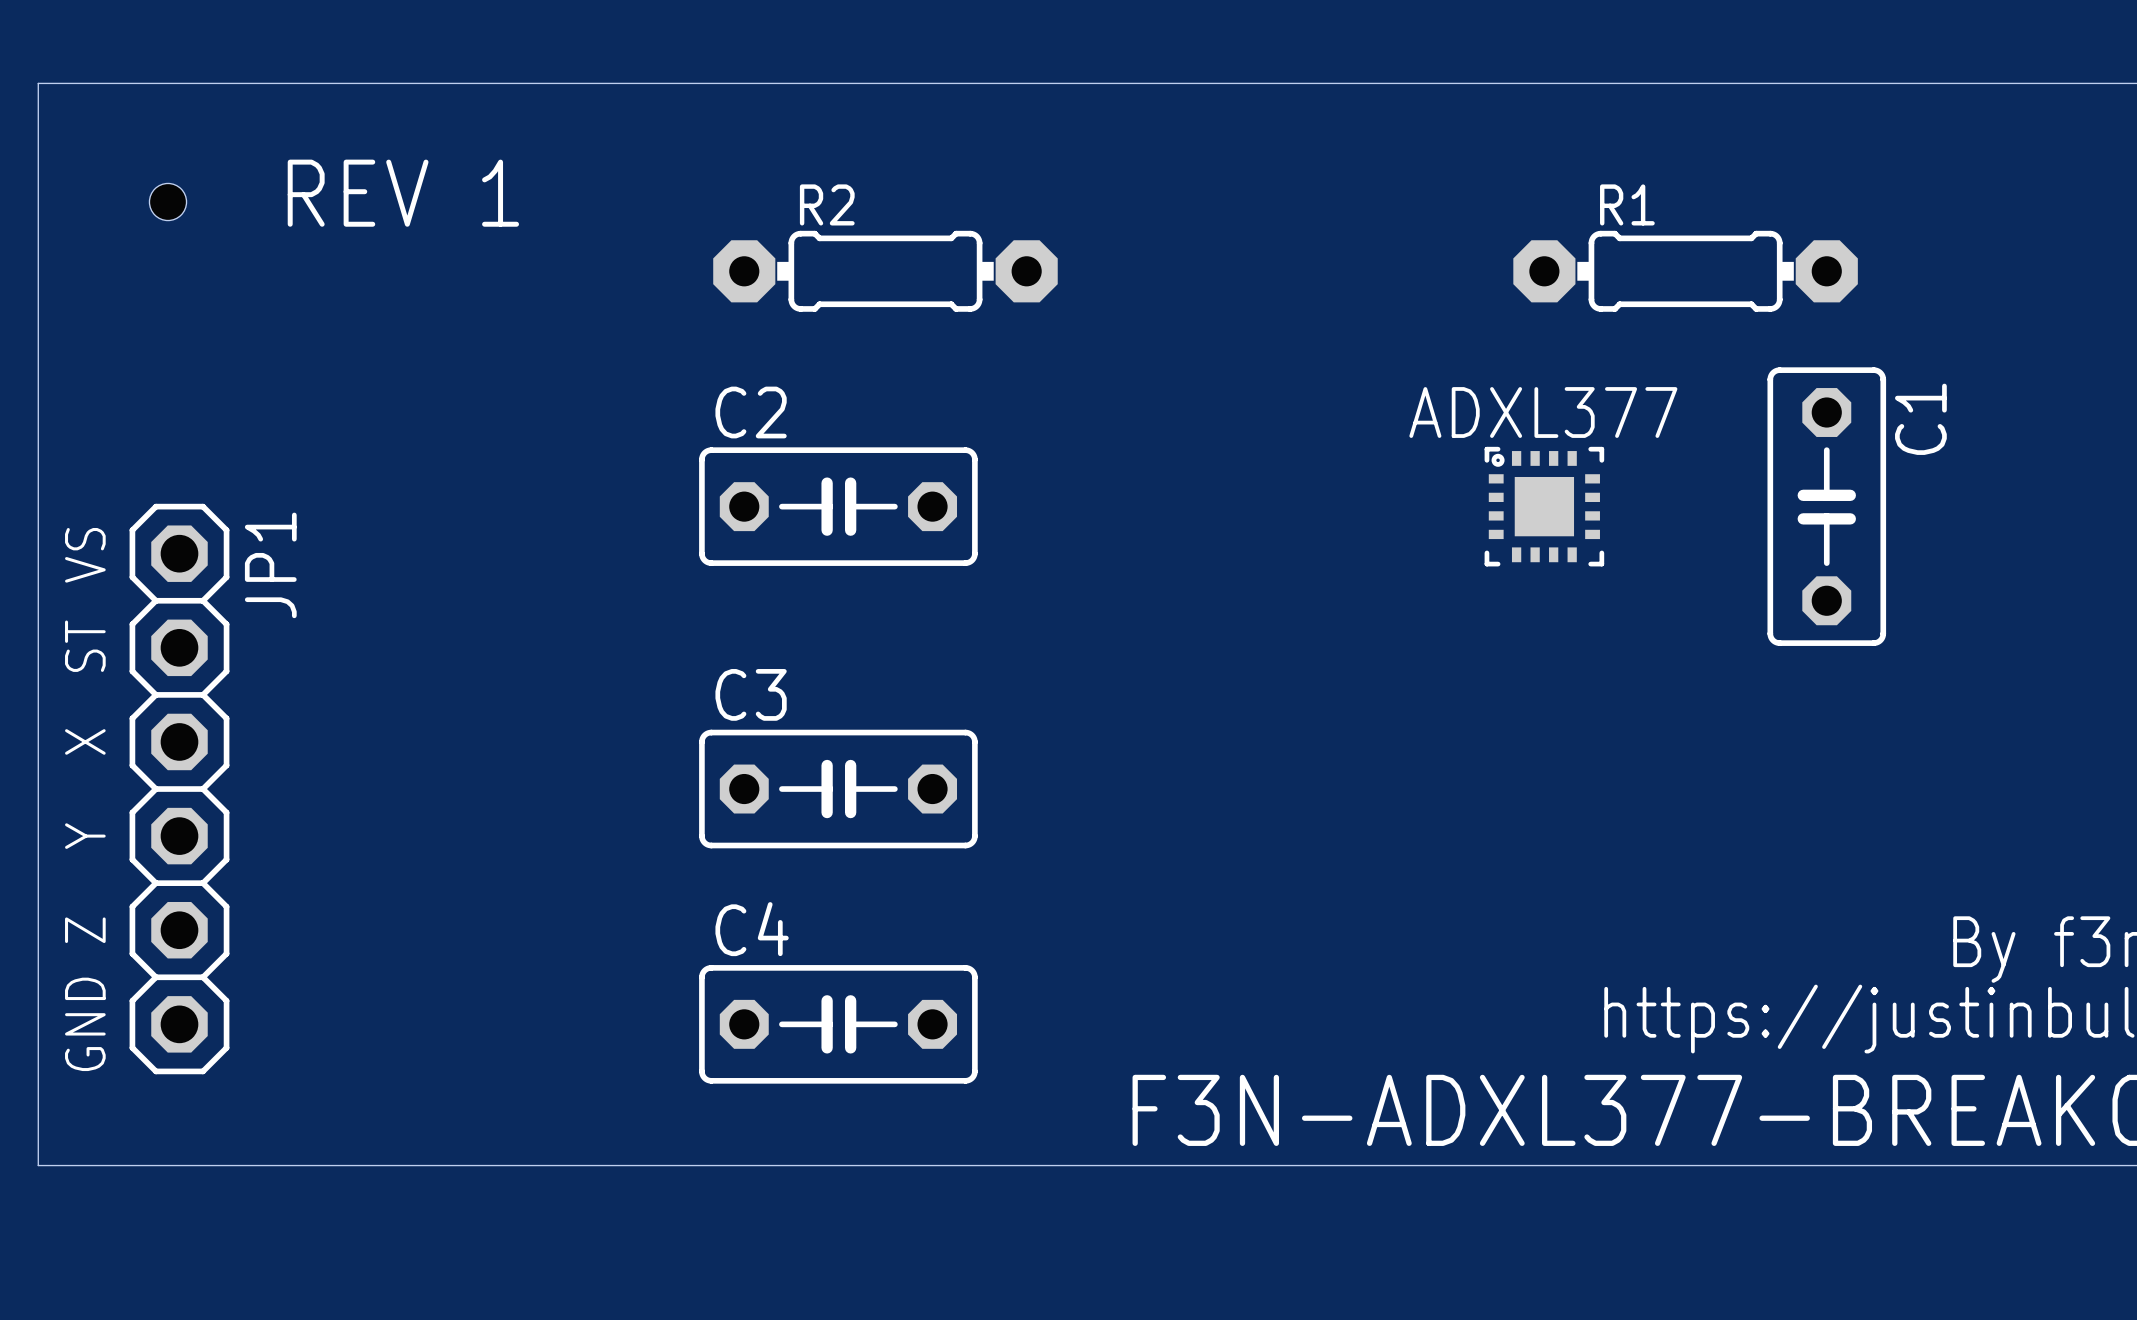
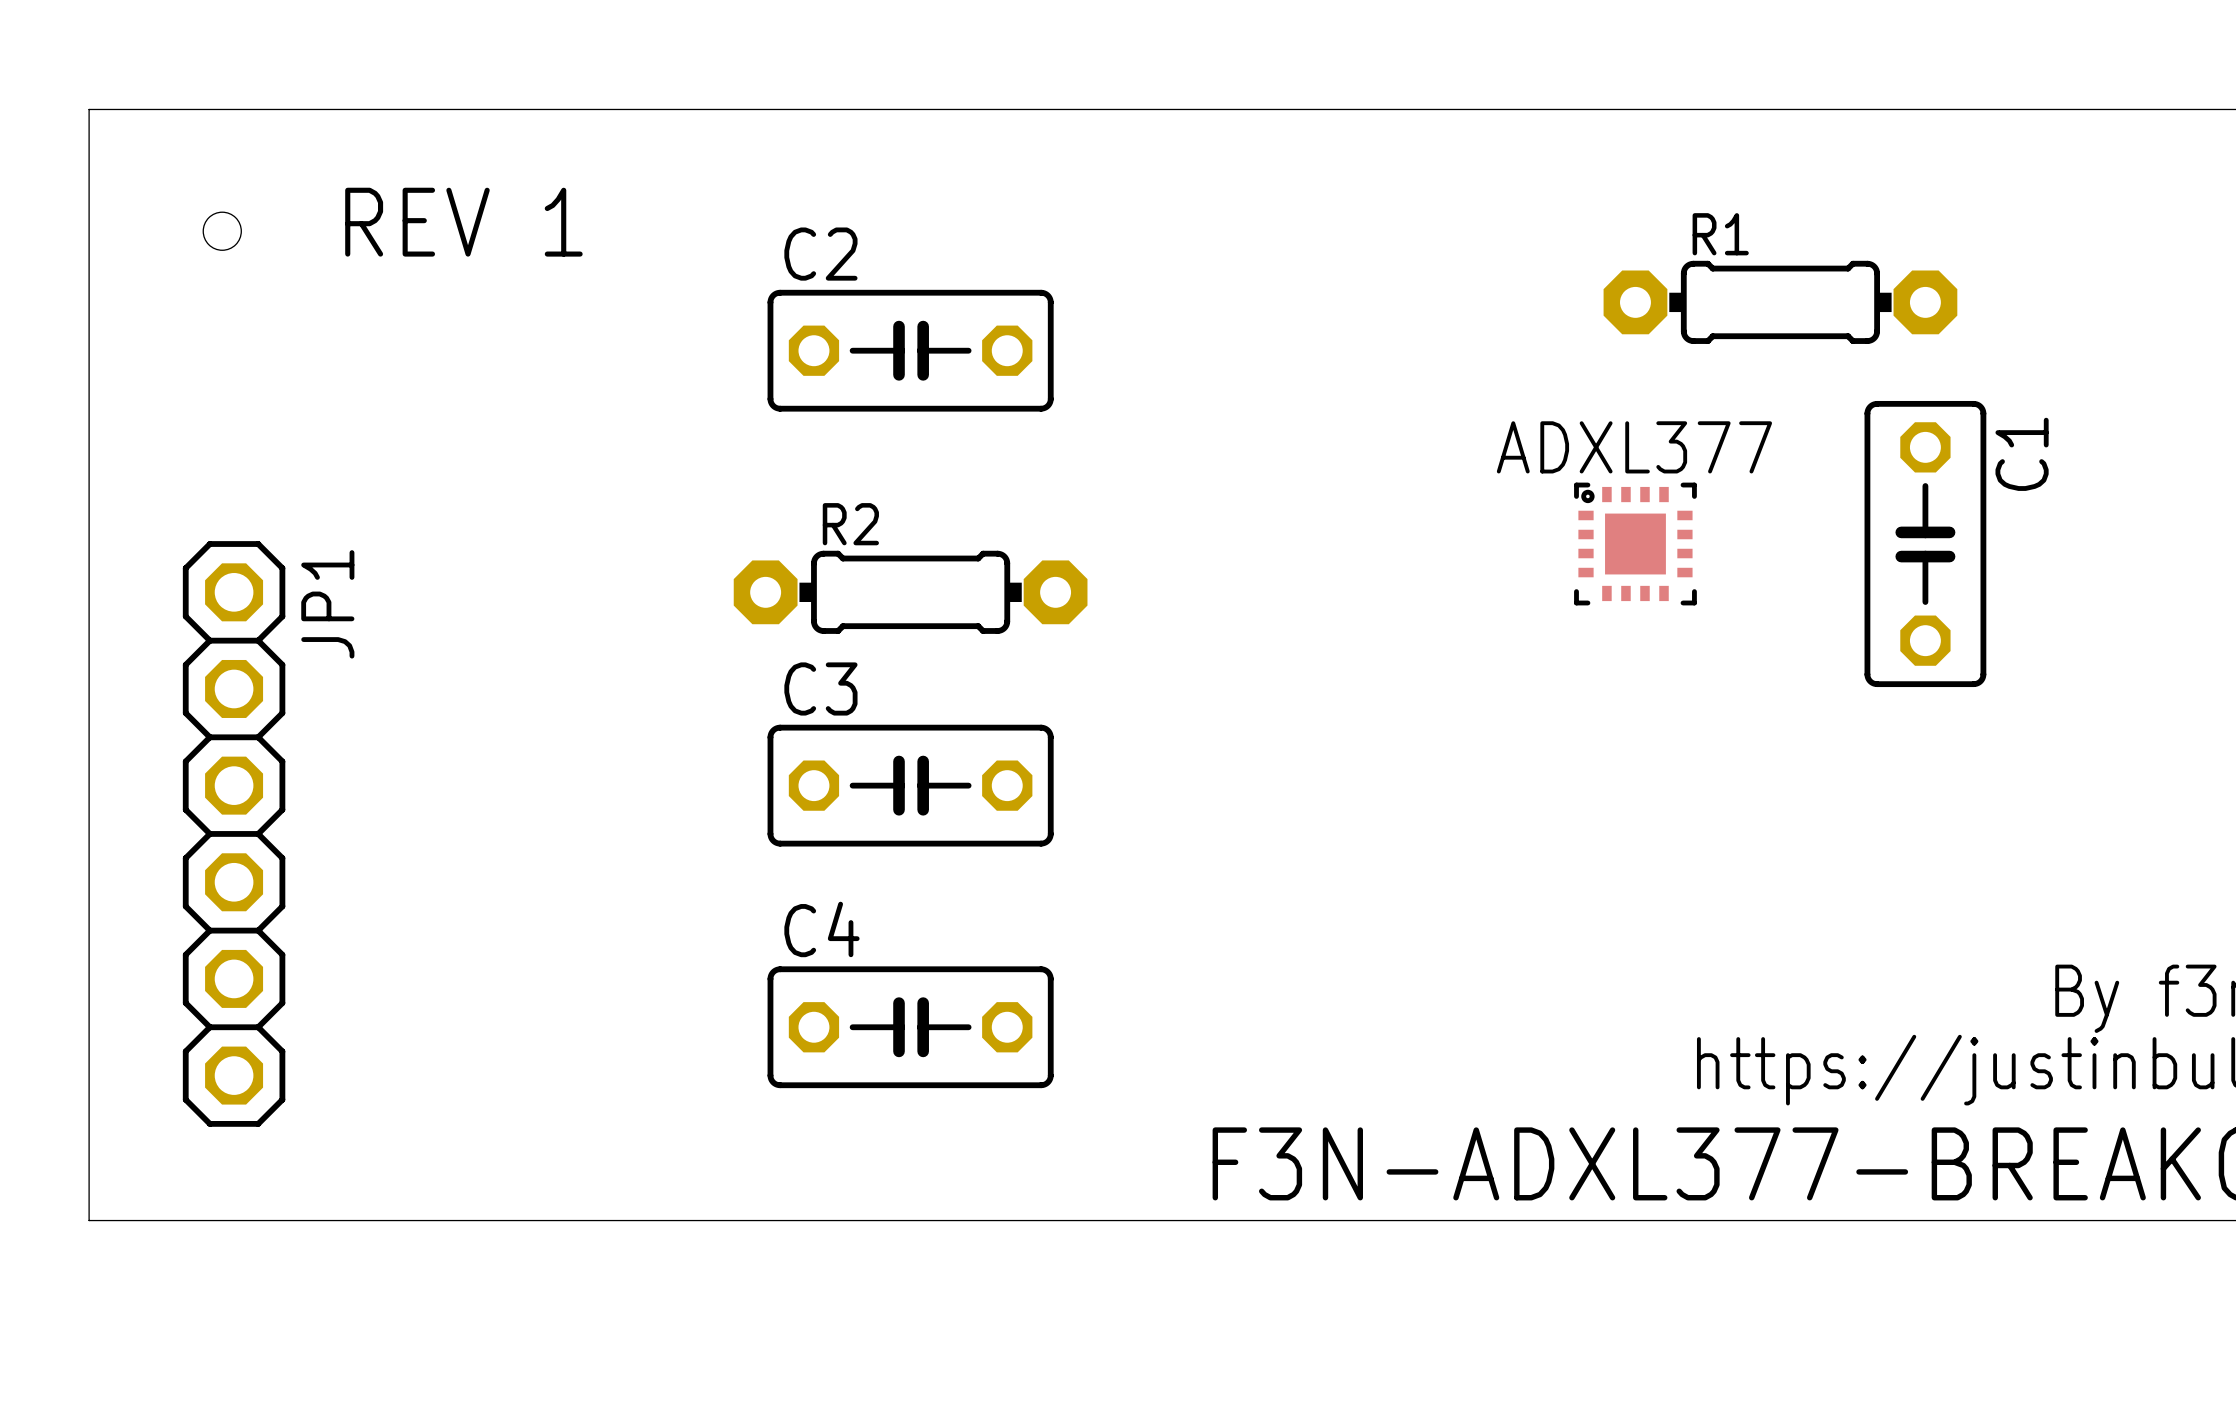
R2 position: (885, 271) -> (910, 592)
C2 position: (838, 506) -> (910, 350)
text: VS (85, 555) -> none
text: ST (85, 646) -> none
text: X (85, 741) -> none
C3 position: (838, 789) -> (910, 785)
text: Y (85, 836) -> none
text: Z (85, 930) -> none
text: GND (85, 1024) -> none
C4 position: (838, 1024) -> (910, 1027)

